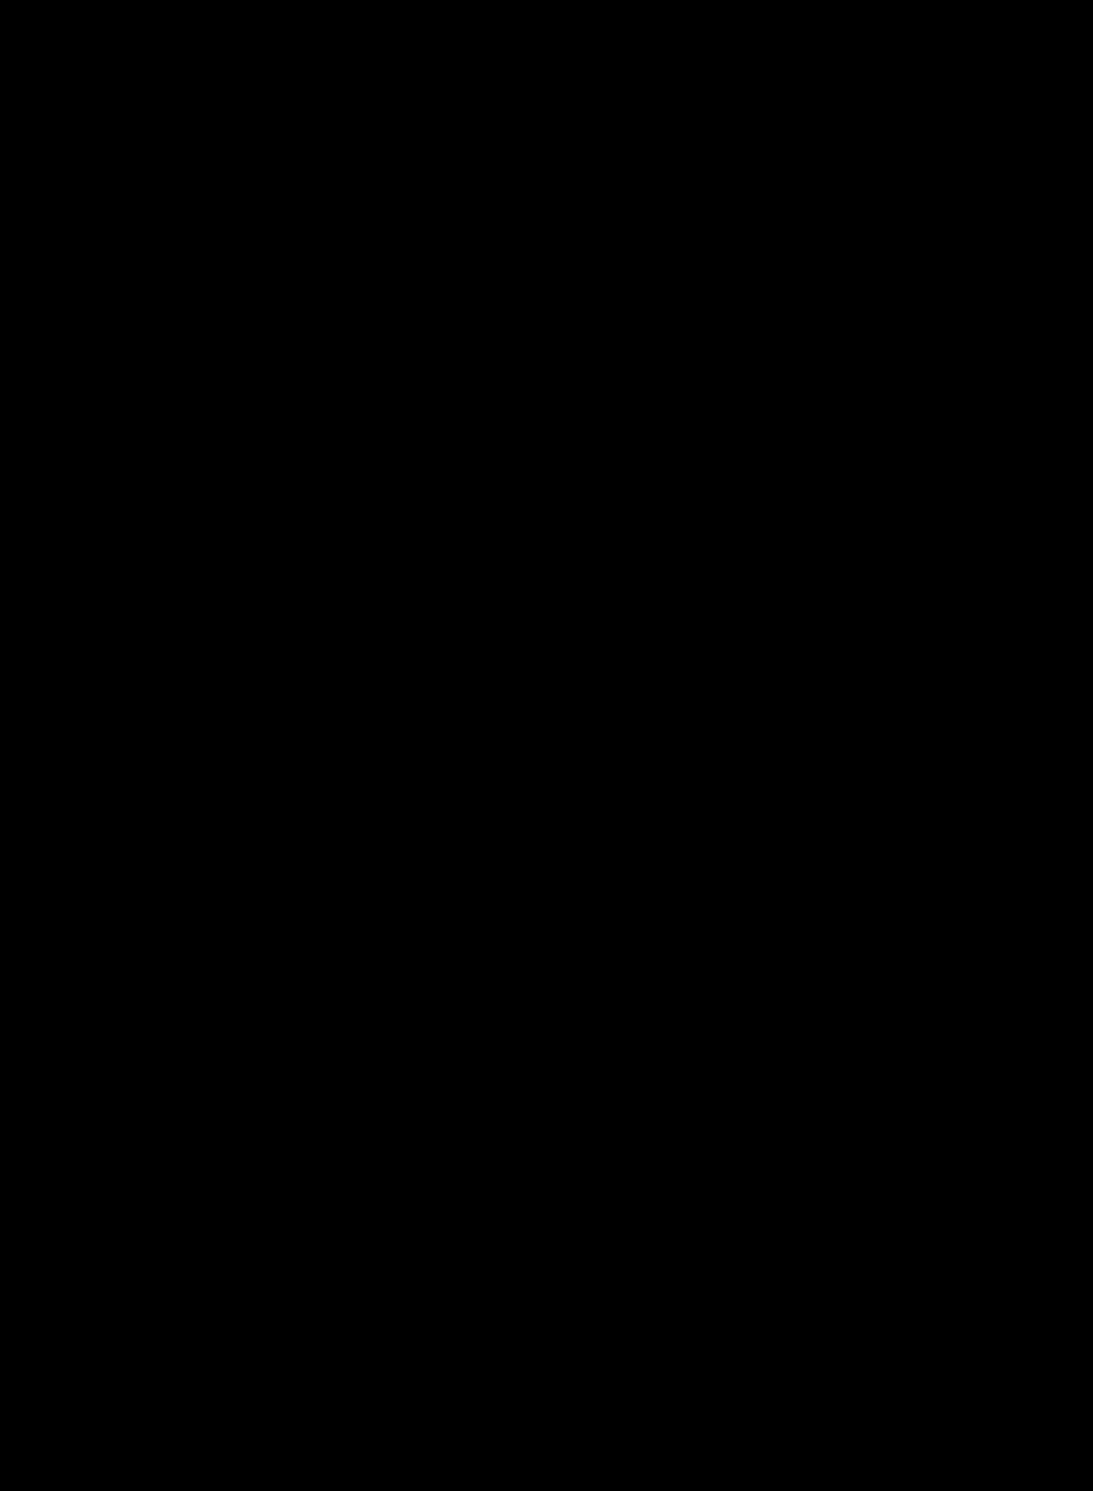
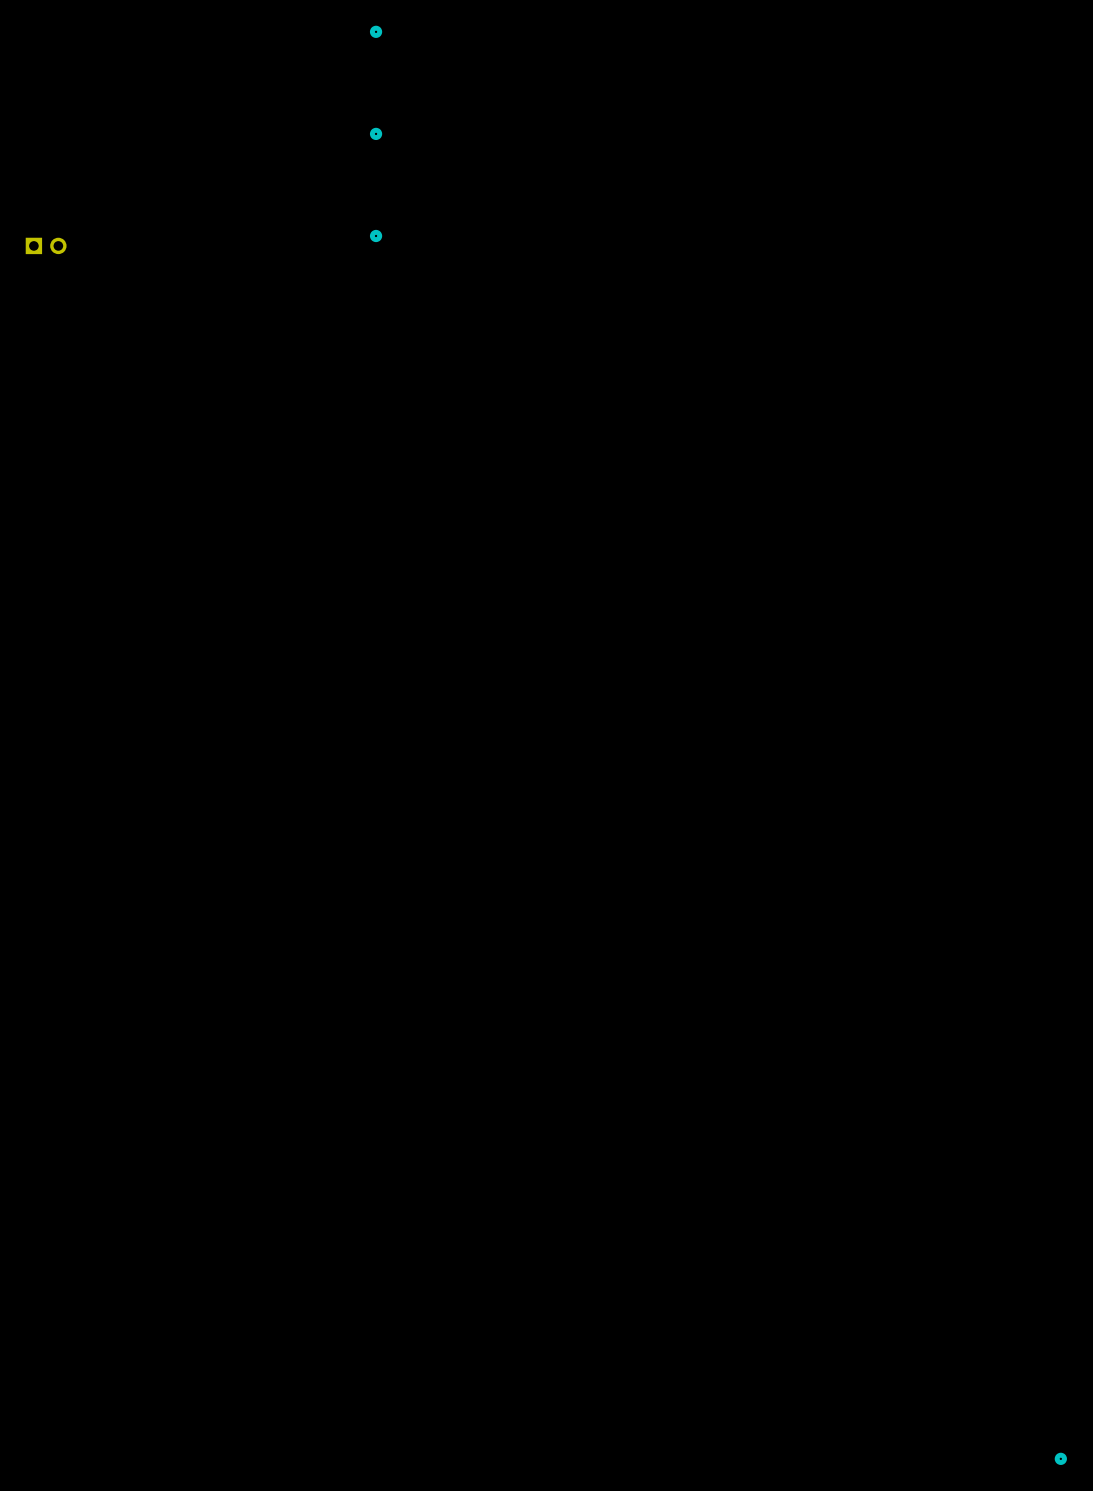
part: none -> (376, 31)
part: none -> (376, 133)
part: none -> (376, 235)
part: none -> (46, 245)
part: none -> (1060, 1458)

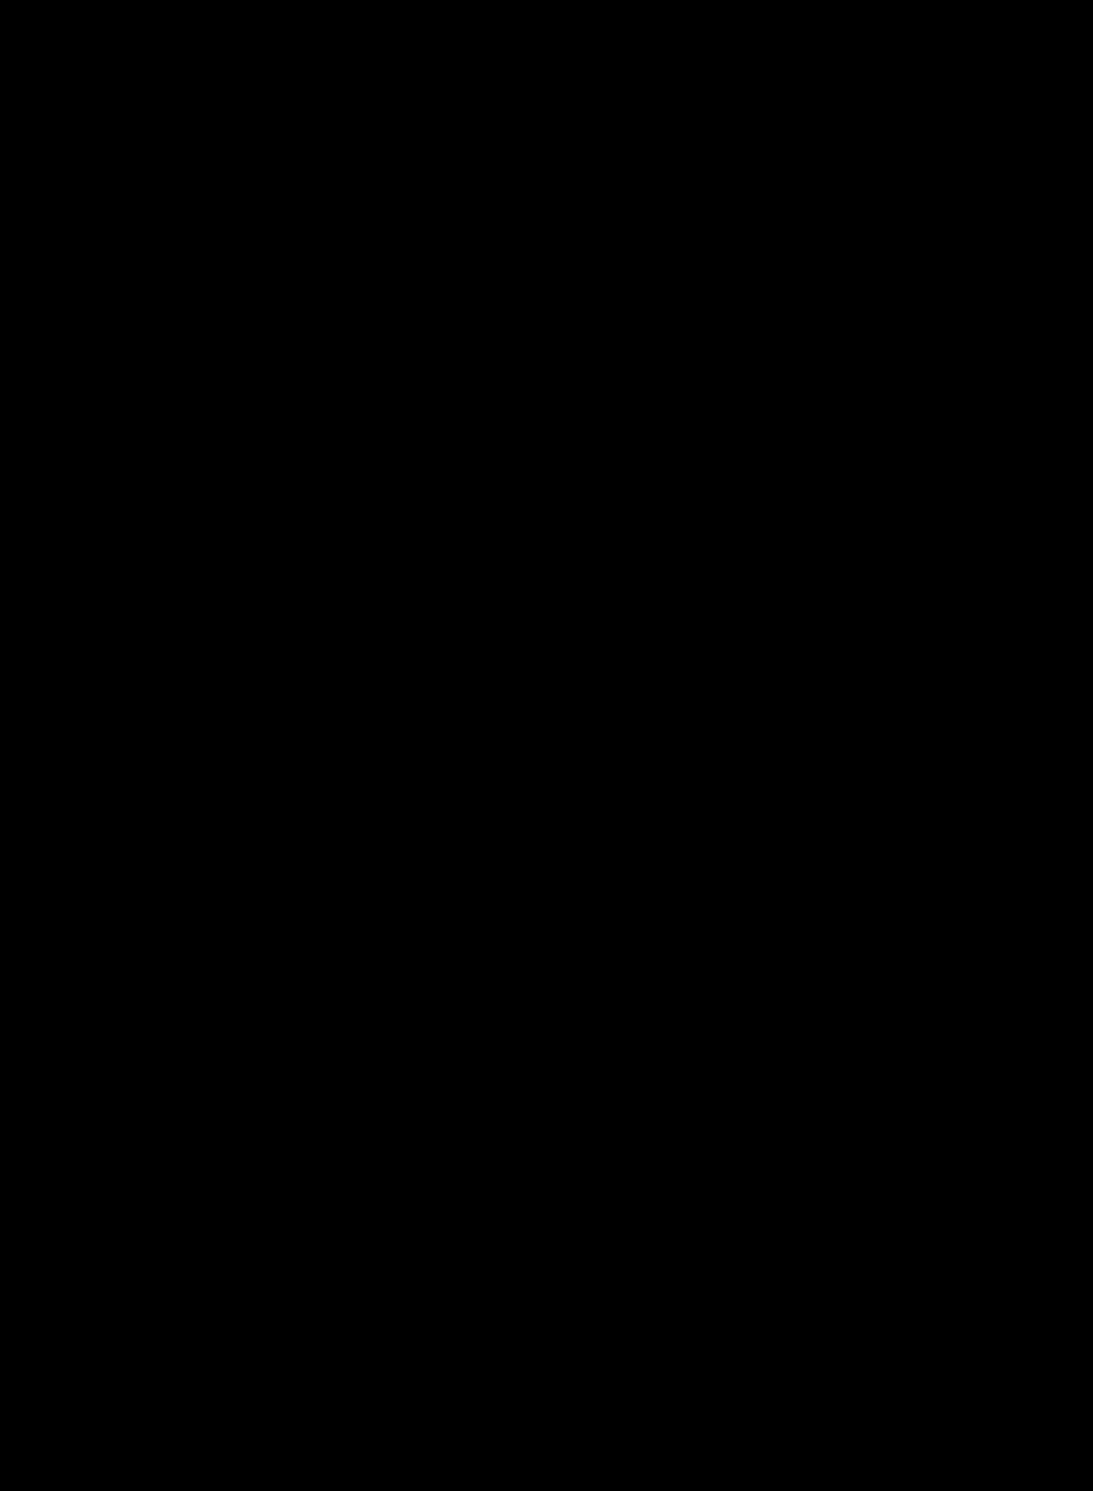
part: (376, 31) -> none
part: (376, 133) -> none
part: (376, 235) -> none
part: (46, 245) -> none
part: (1060, 1458) -> none

